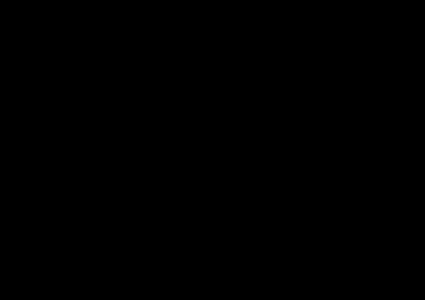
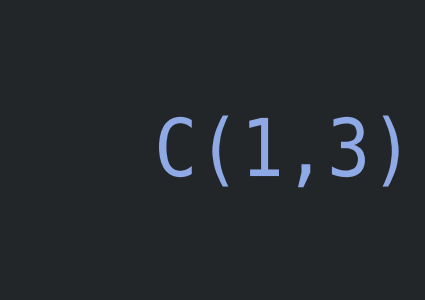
text: none -> C(1,3) (278, 151)

